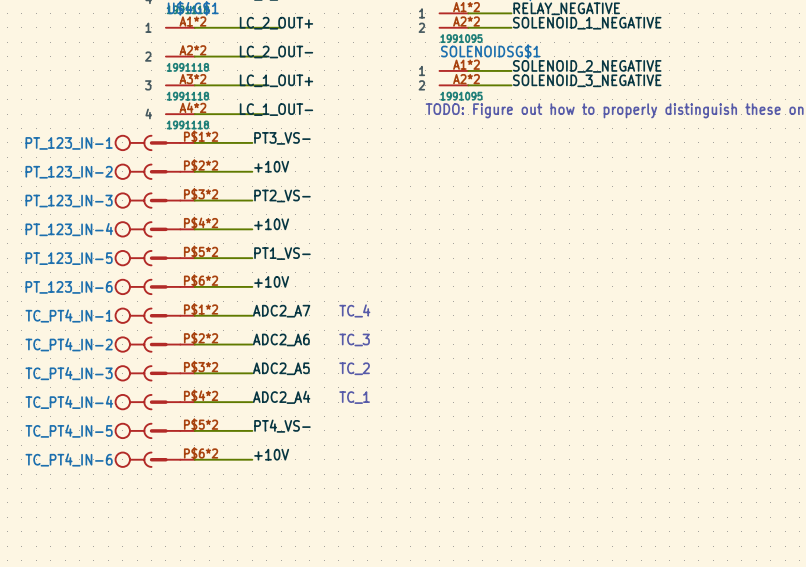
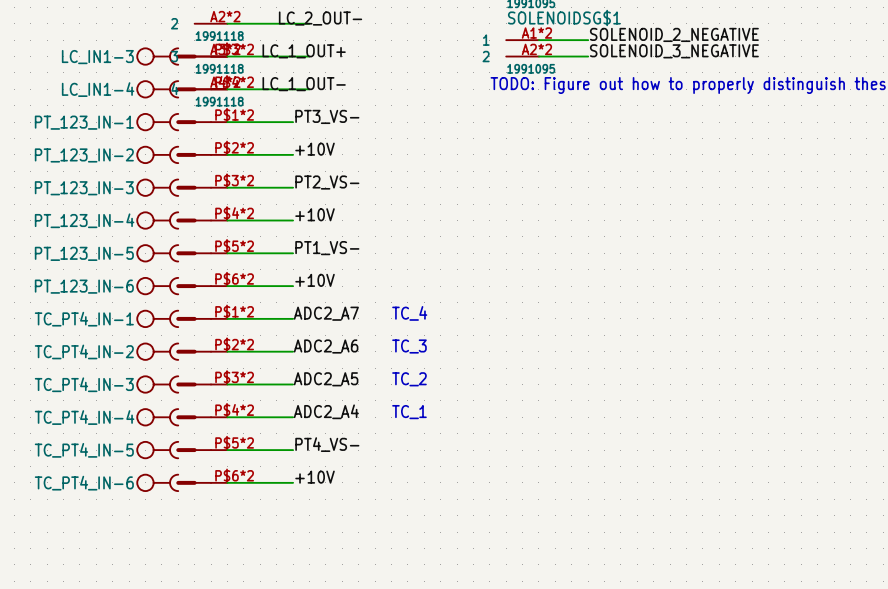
label position: LC_1_OUT+ (276, 80) -> LC_1_OUT+ (304, 51)
LC_IN1-3: none -> (181, 56)
label position: LC_1_OUT- (276, 109) -> LC_1_OUT- (304, 84)
LC_IN1-4: none -> (181, 89)

